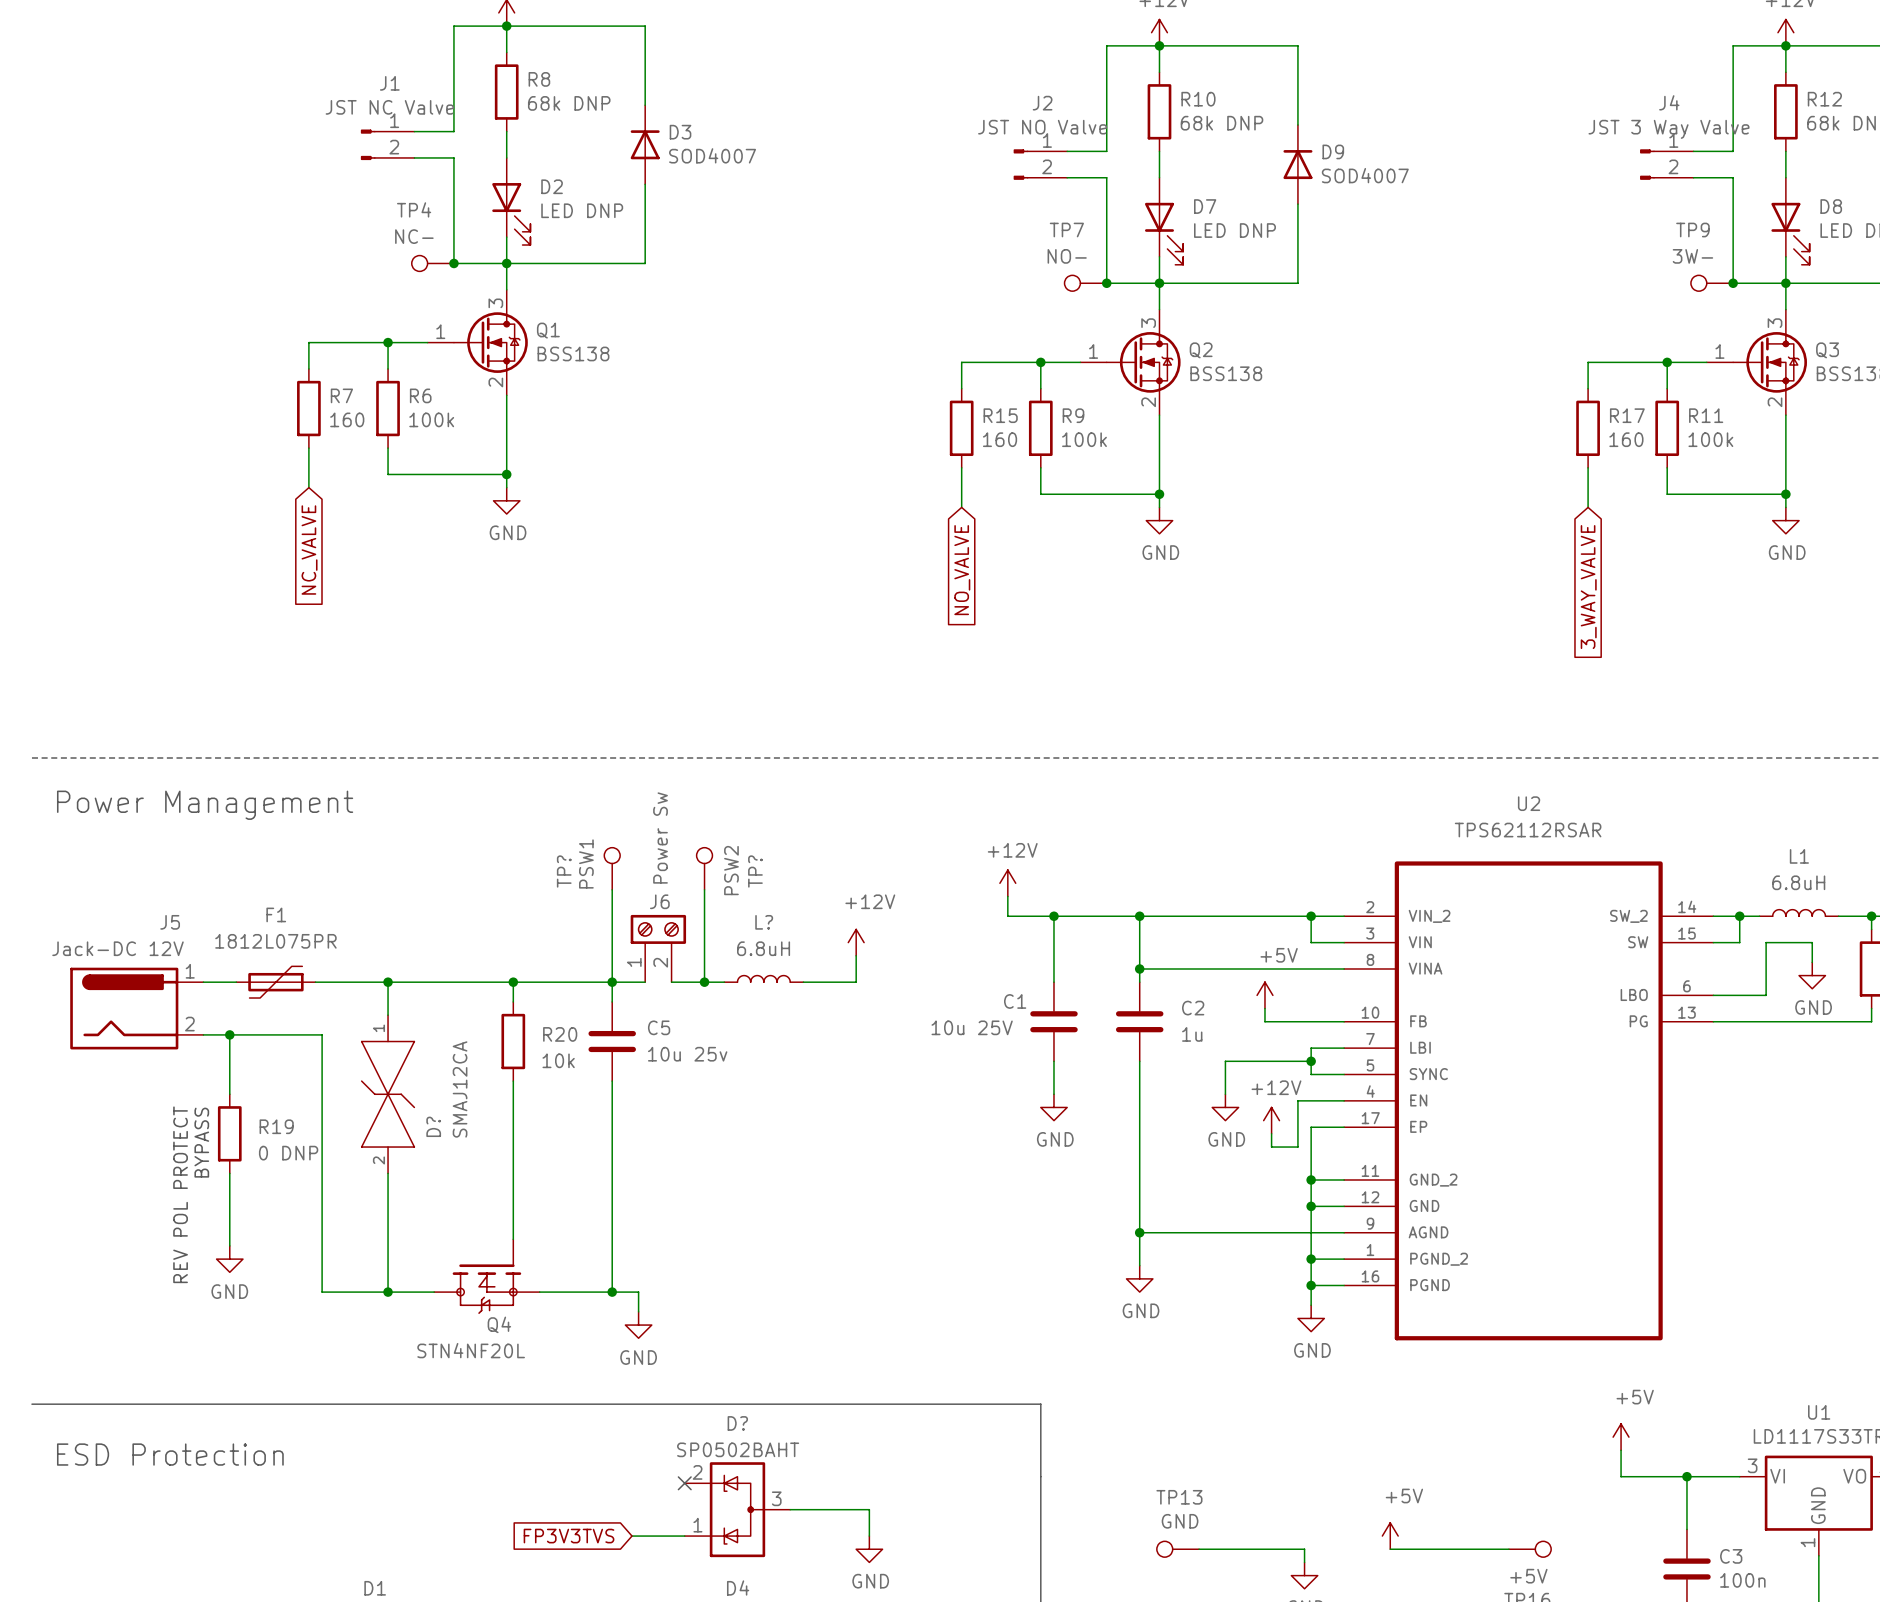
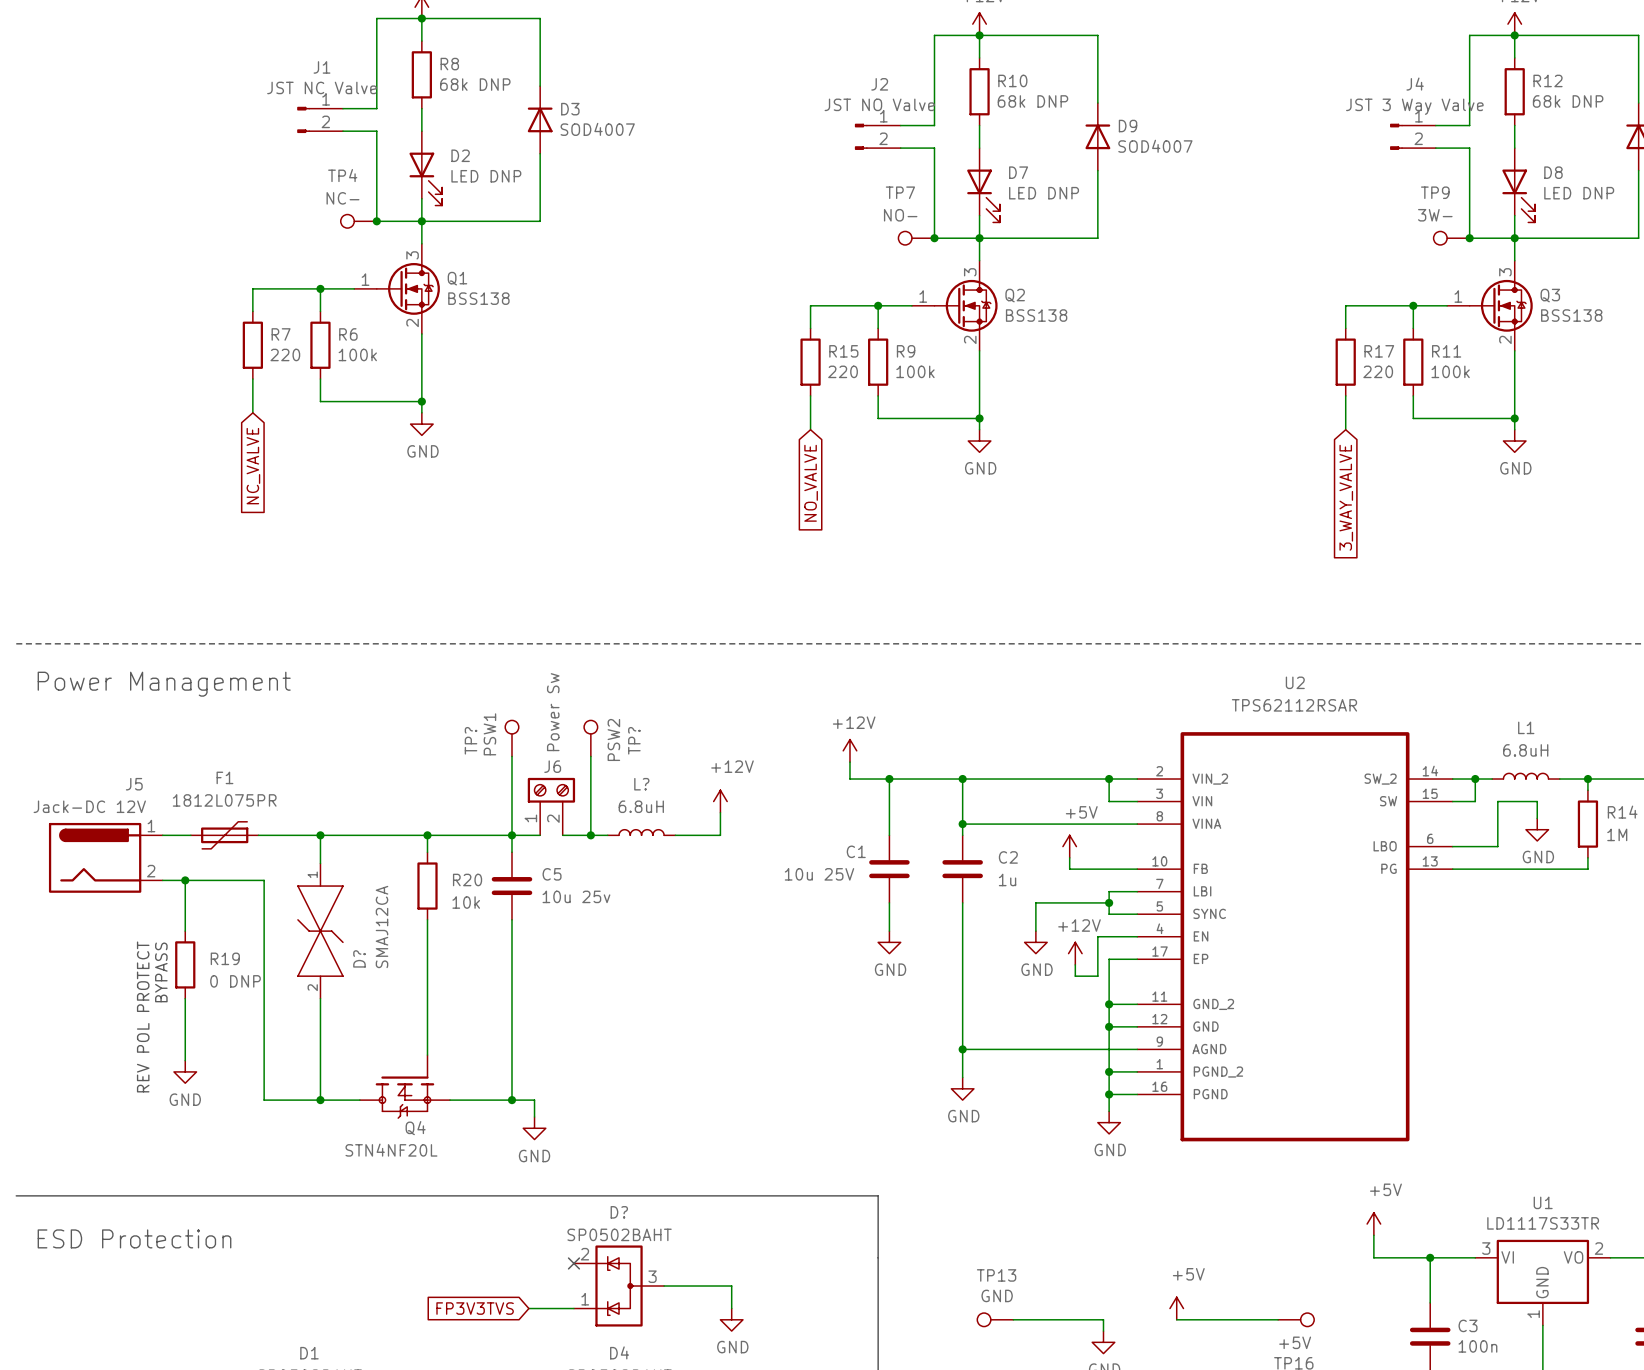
R7 value: 160 (347, 419) -> 220 (285, 354)
R15 value: 160 (1000, 439) -> 220 (843, 371)
R17 value: 160 (1626, 439) -> 220 (1378, 371)

